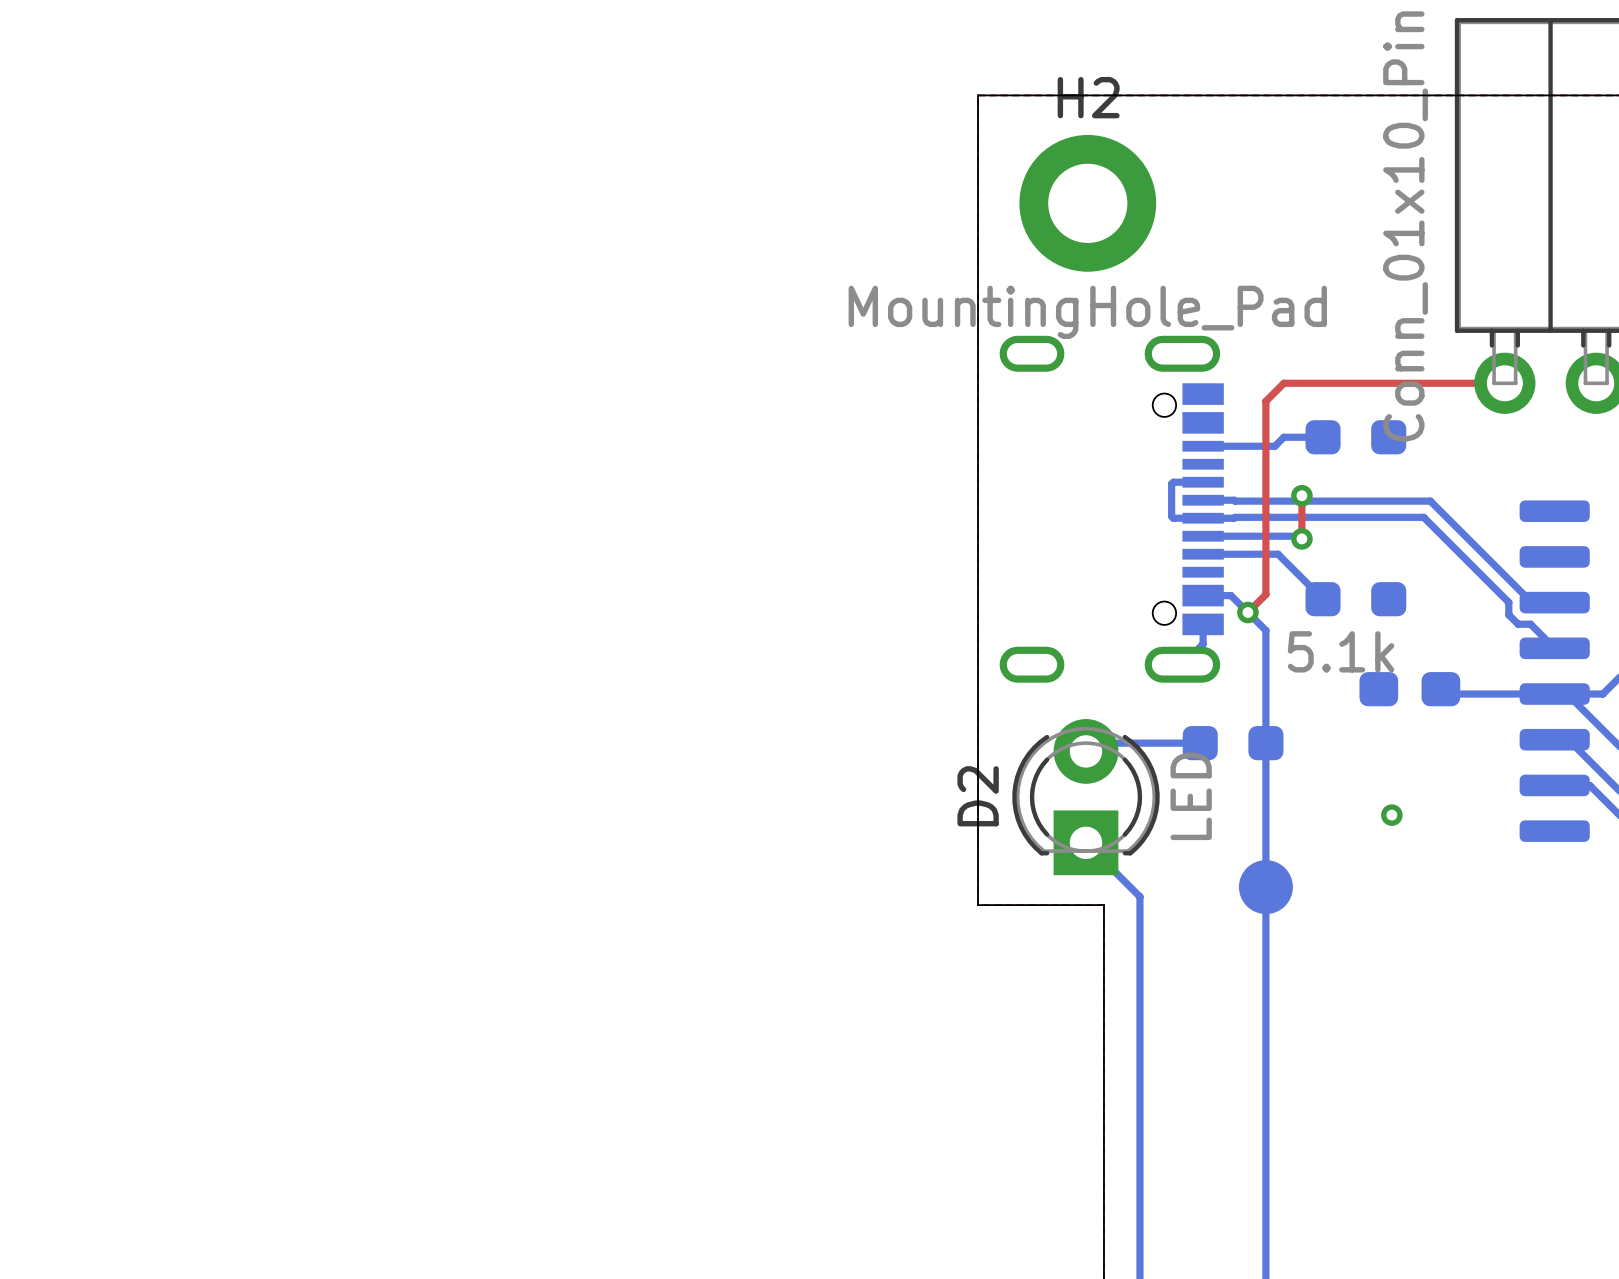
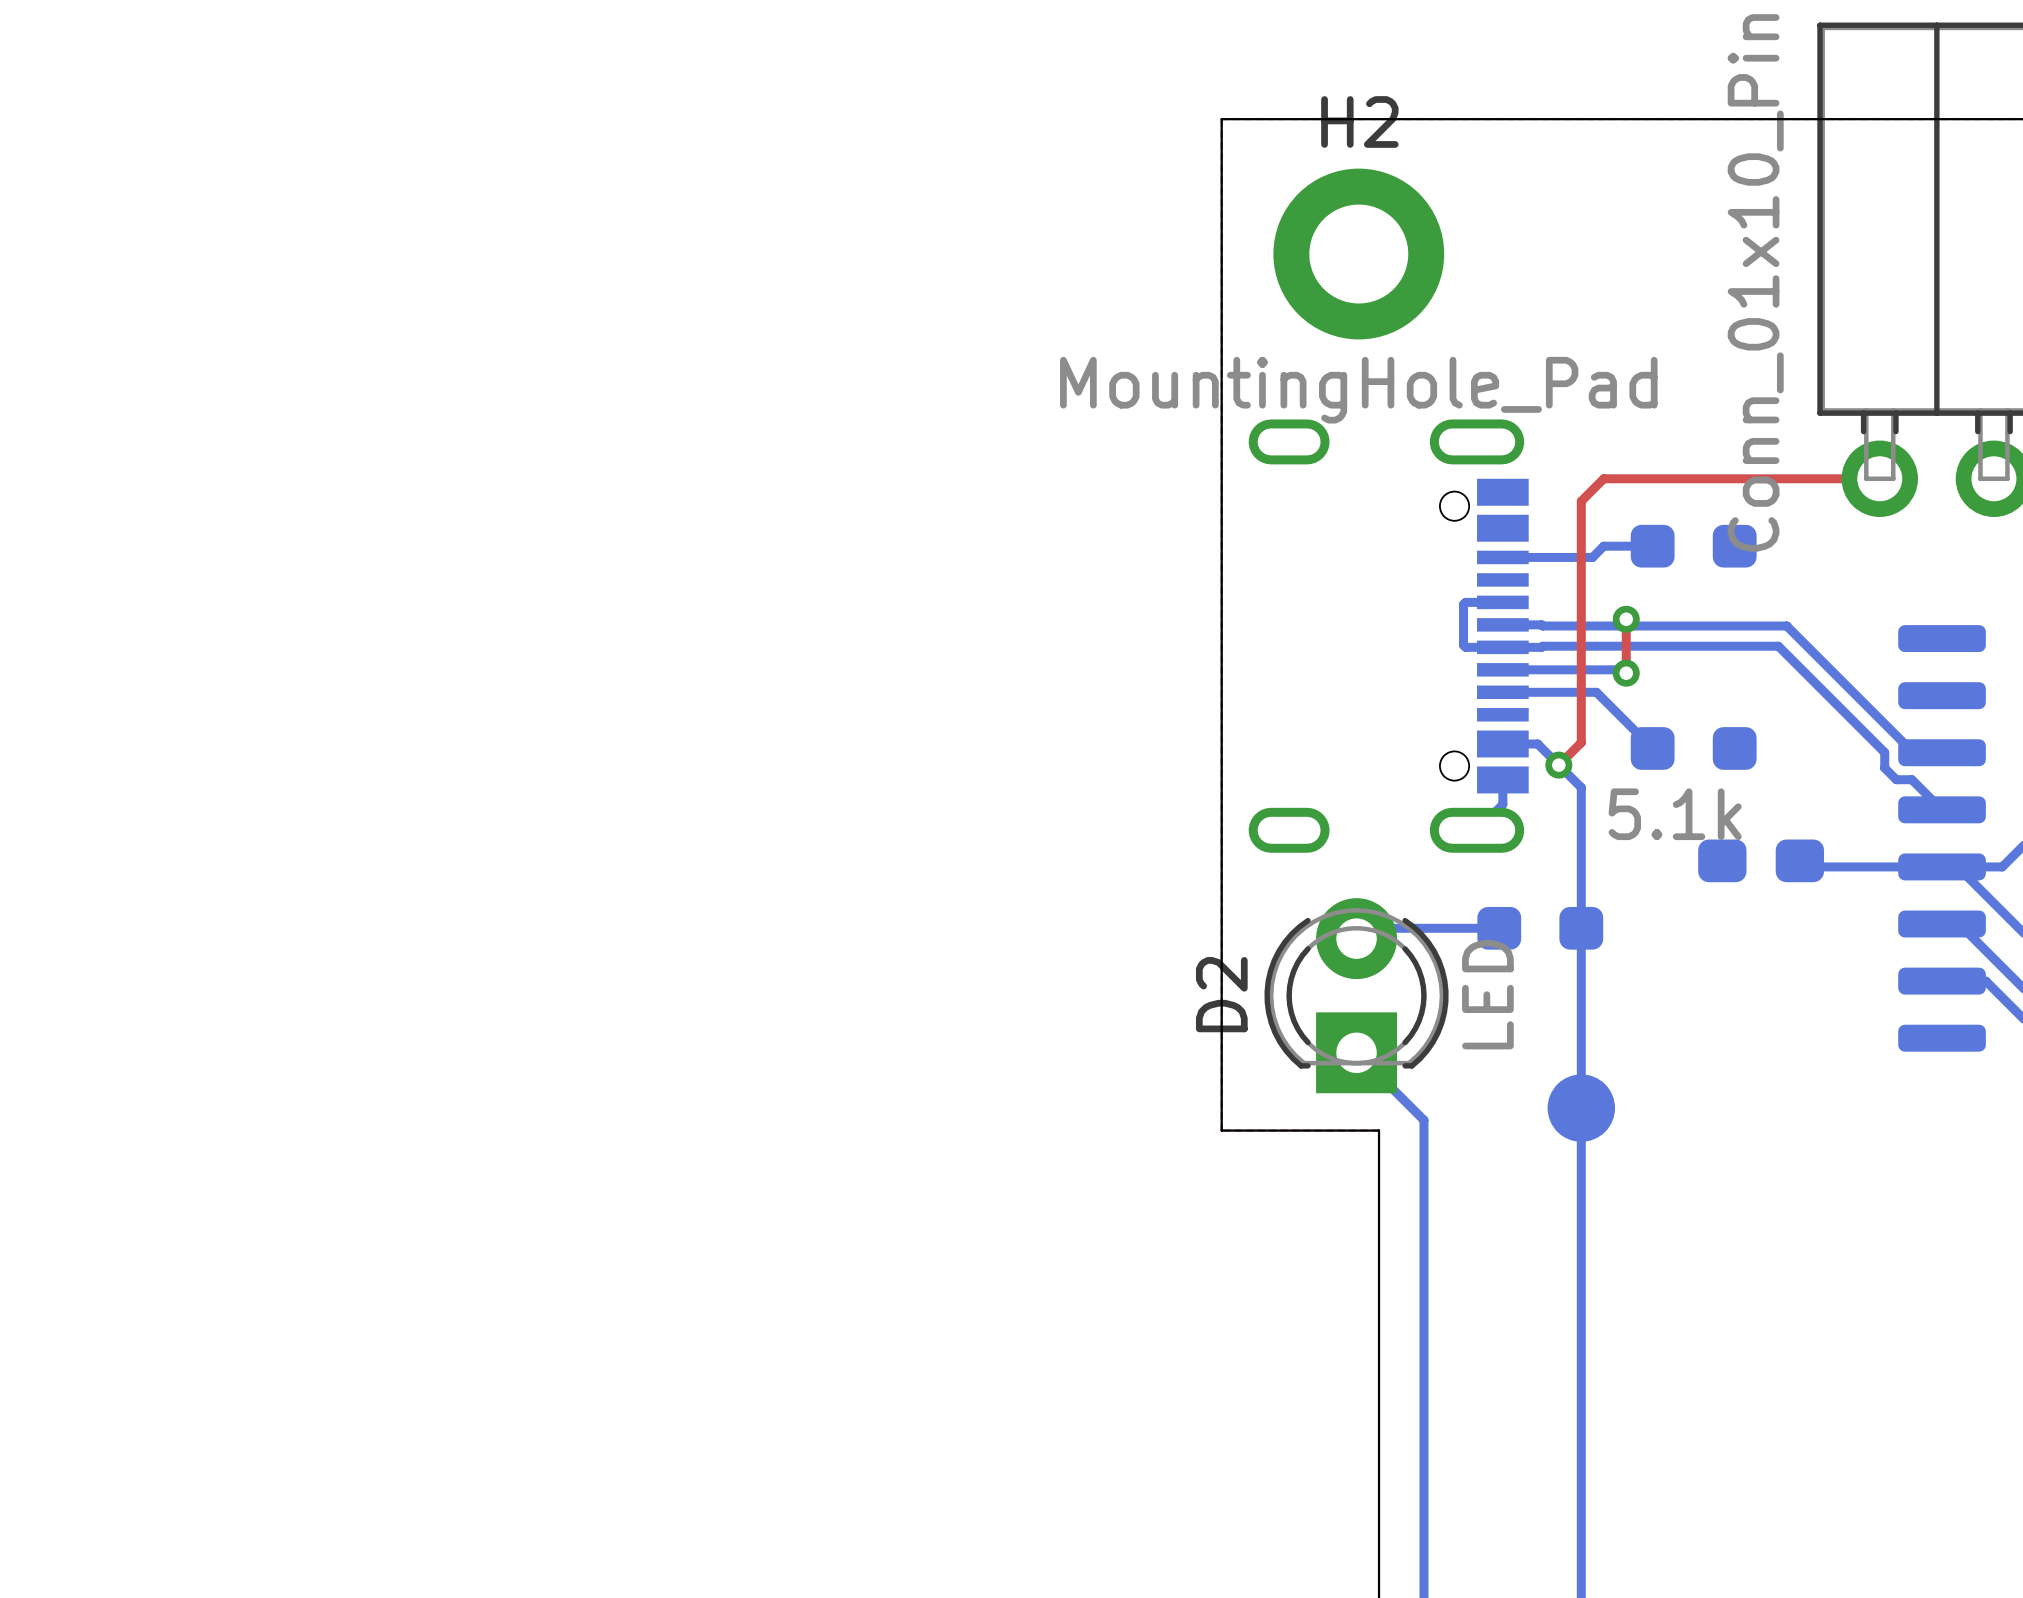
via: (1391, 815) -> none

